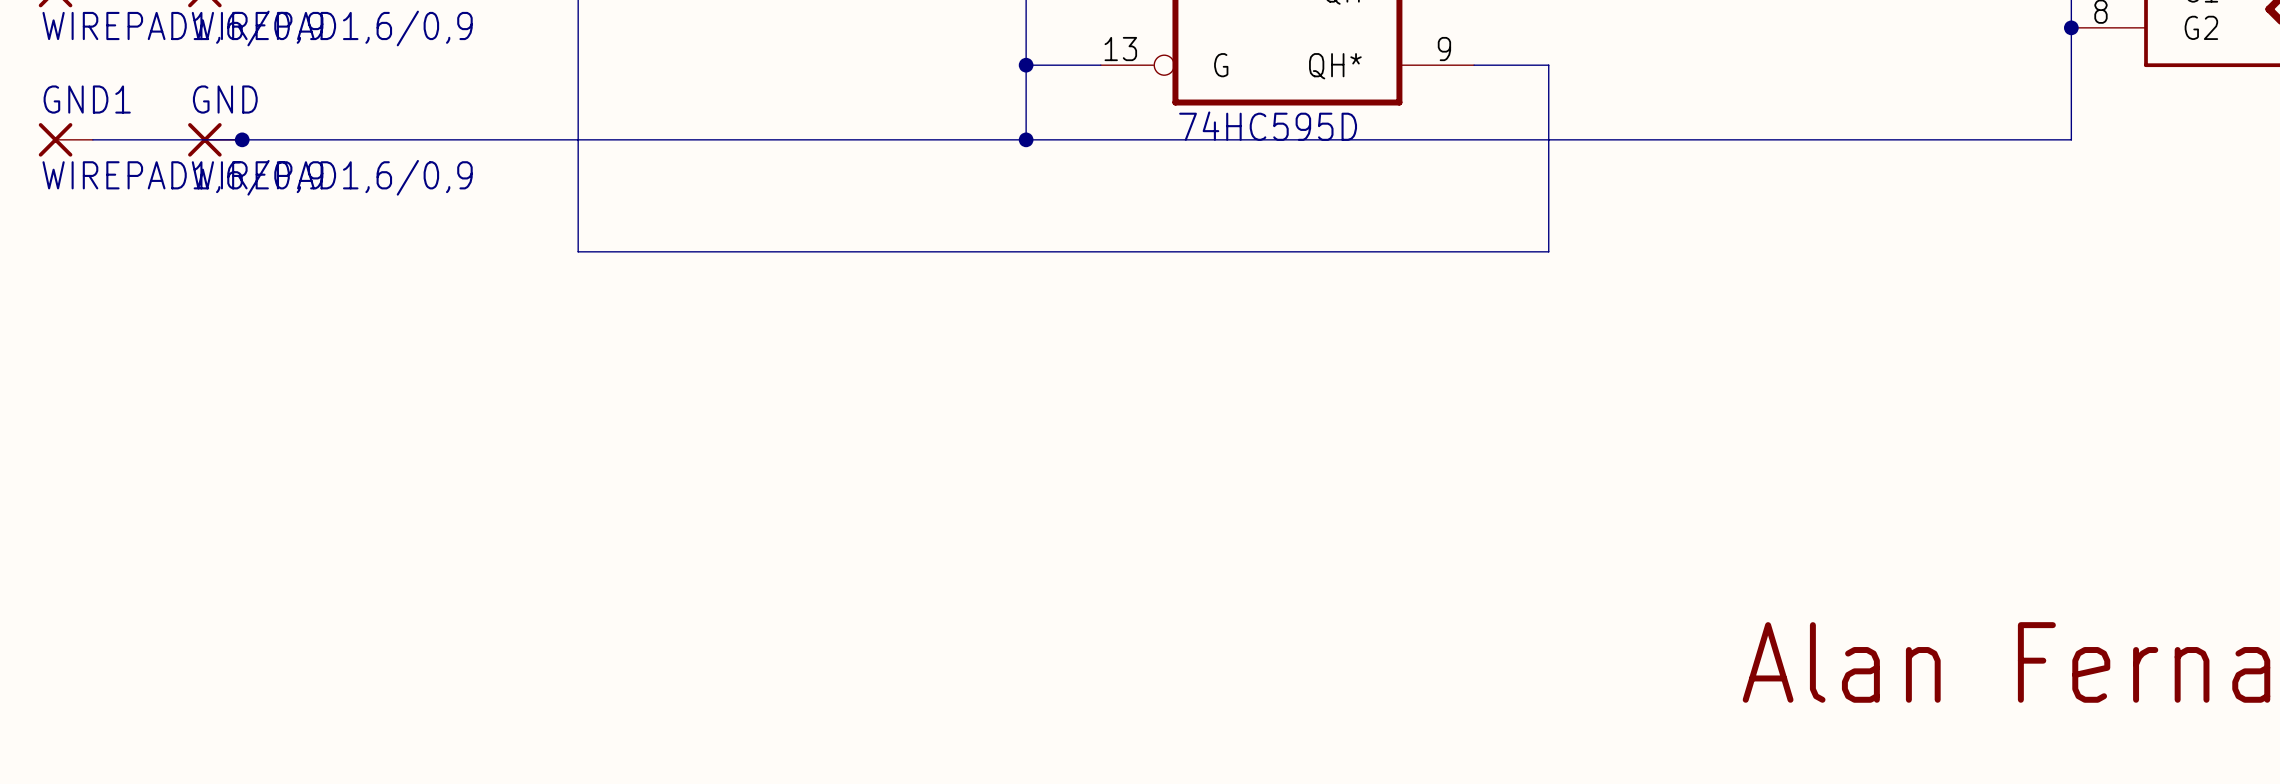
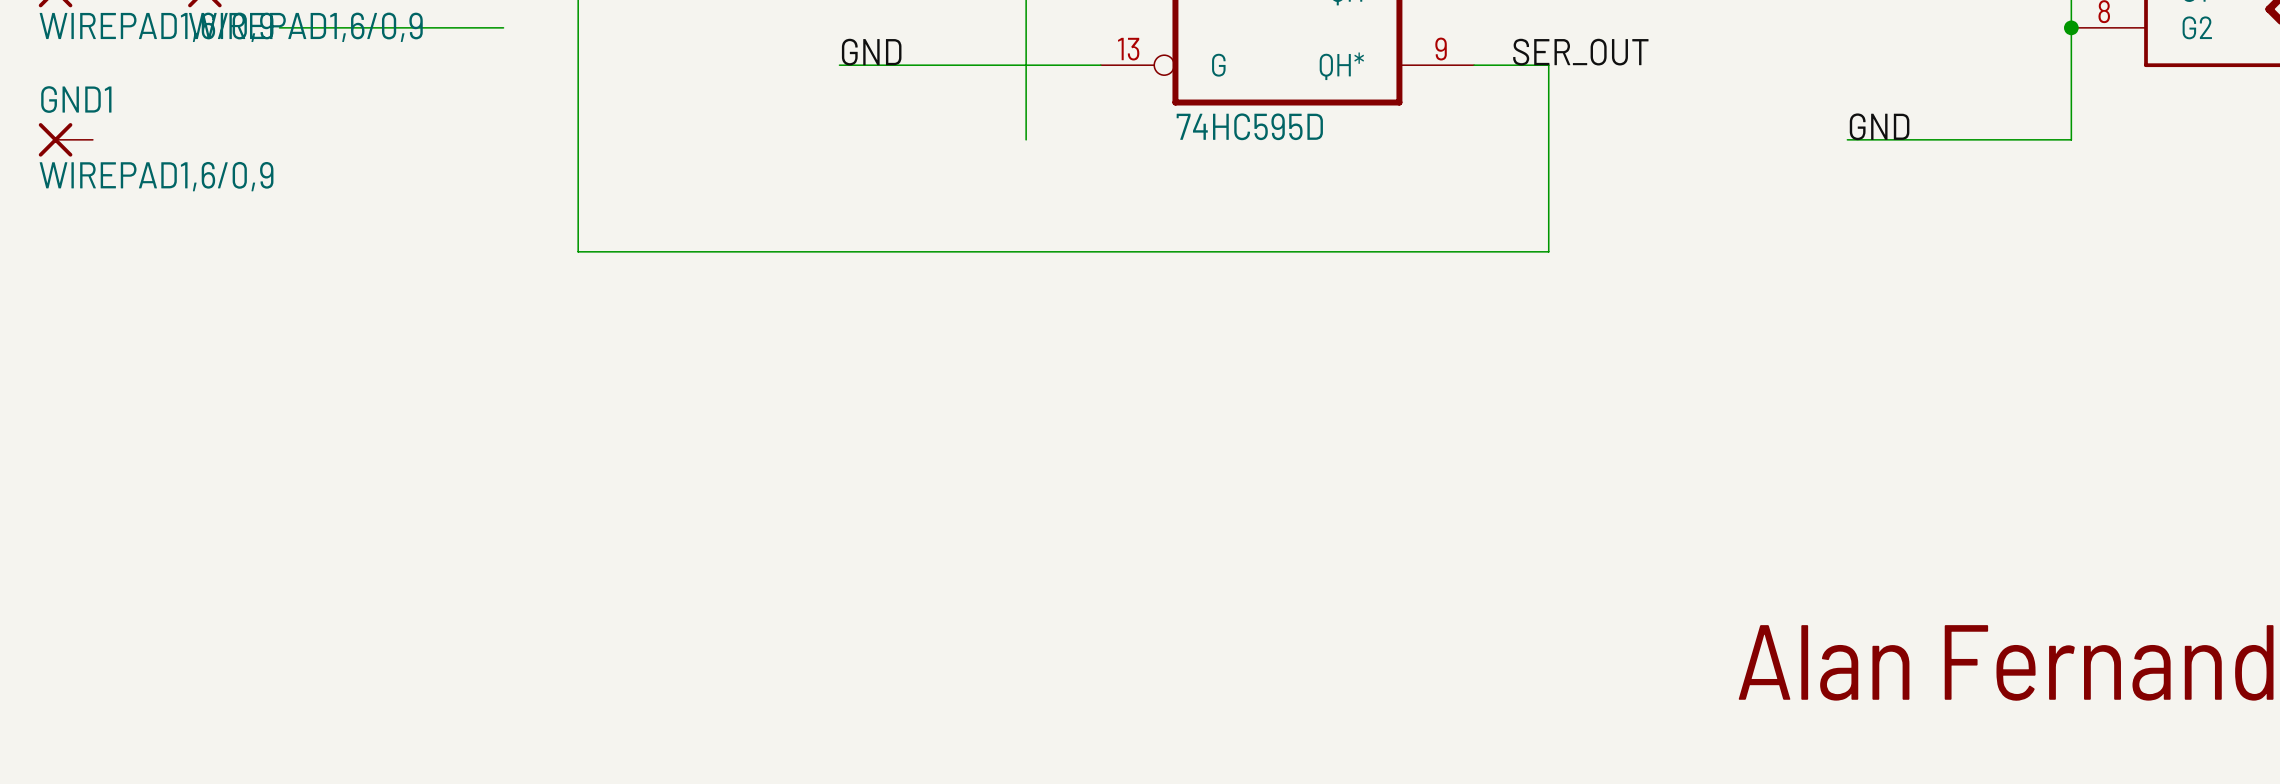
wire: none -> (279, 27) (503, 27)
label: none -> GND (871, 52)
label: none -> SER_OUT (1580, 52)
wire: none -> (839, 65) (1026, 65)
junction: (1026, 65) -> none
label: none -> GND (1879, 126)
wire: (92, 139) (1847, 139) -> none
GND: WIREPAD1,6/0,9 (215, 139) -> none
junction: (242, 139) -> none
junction: (1026, 139) -> none

